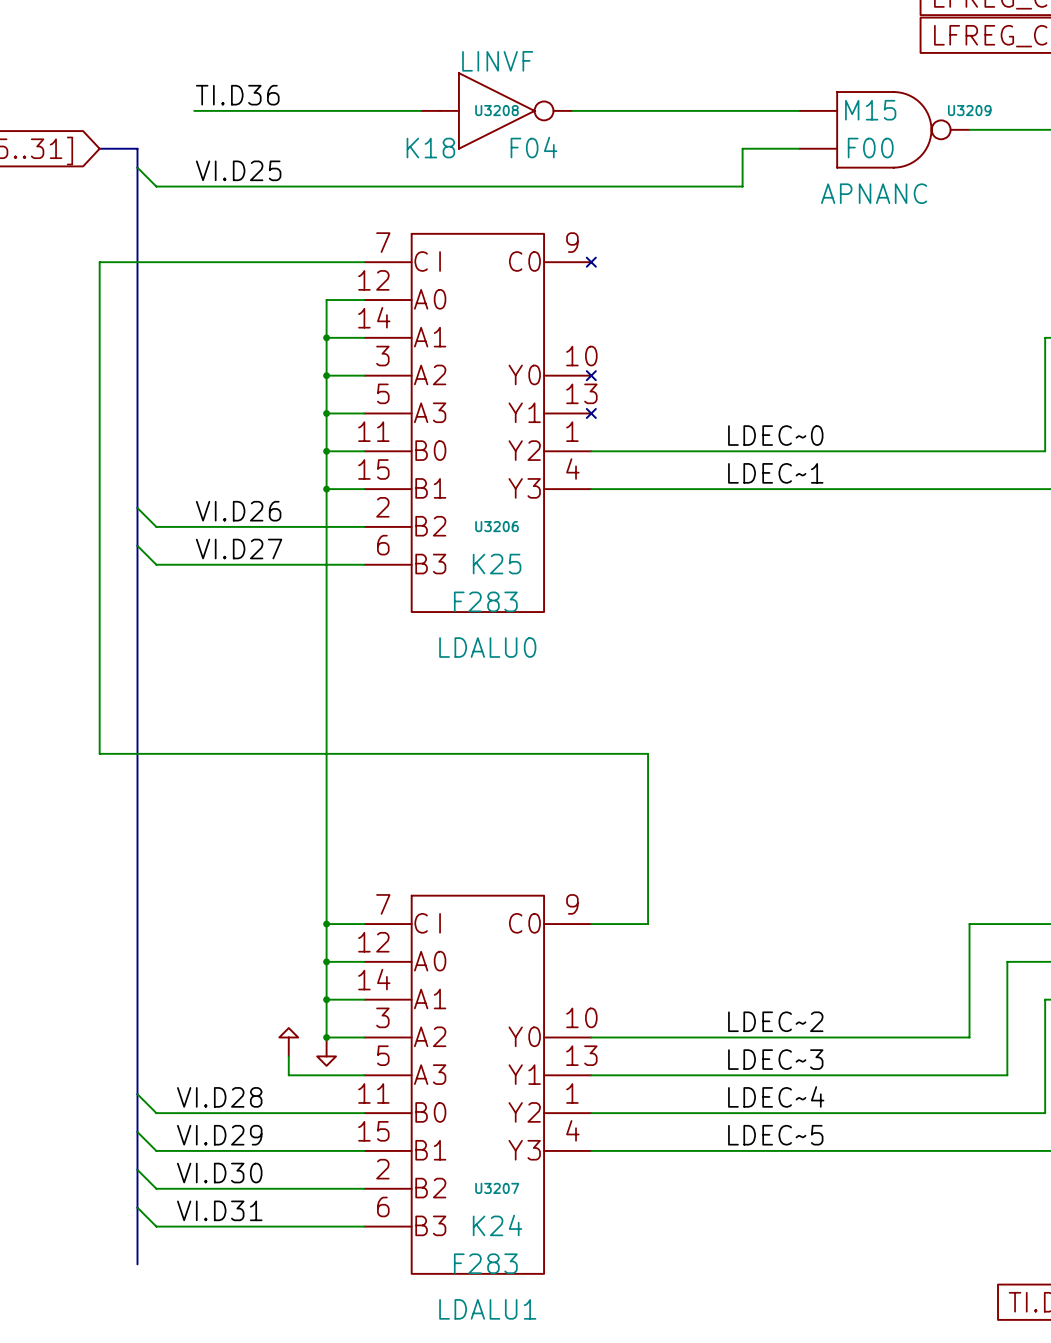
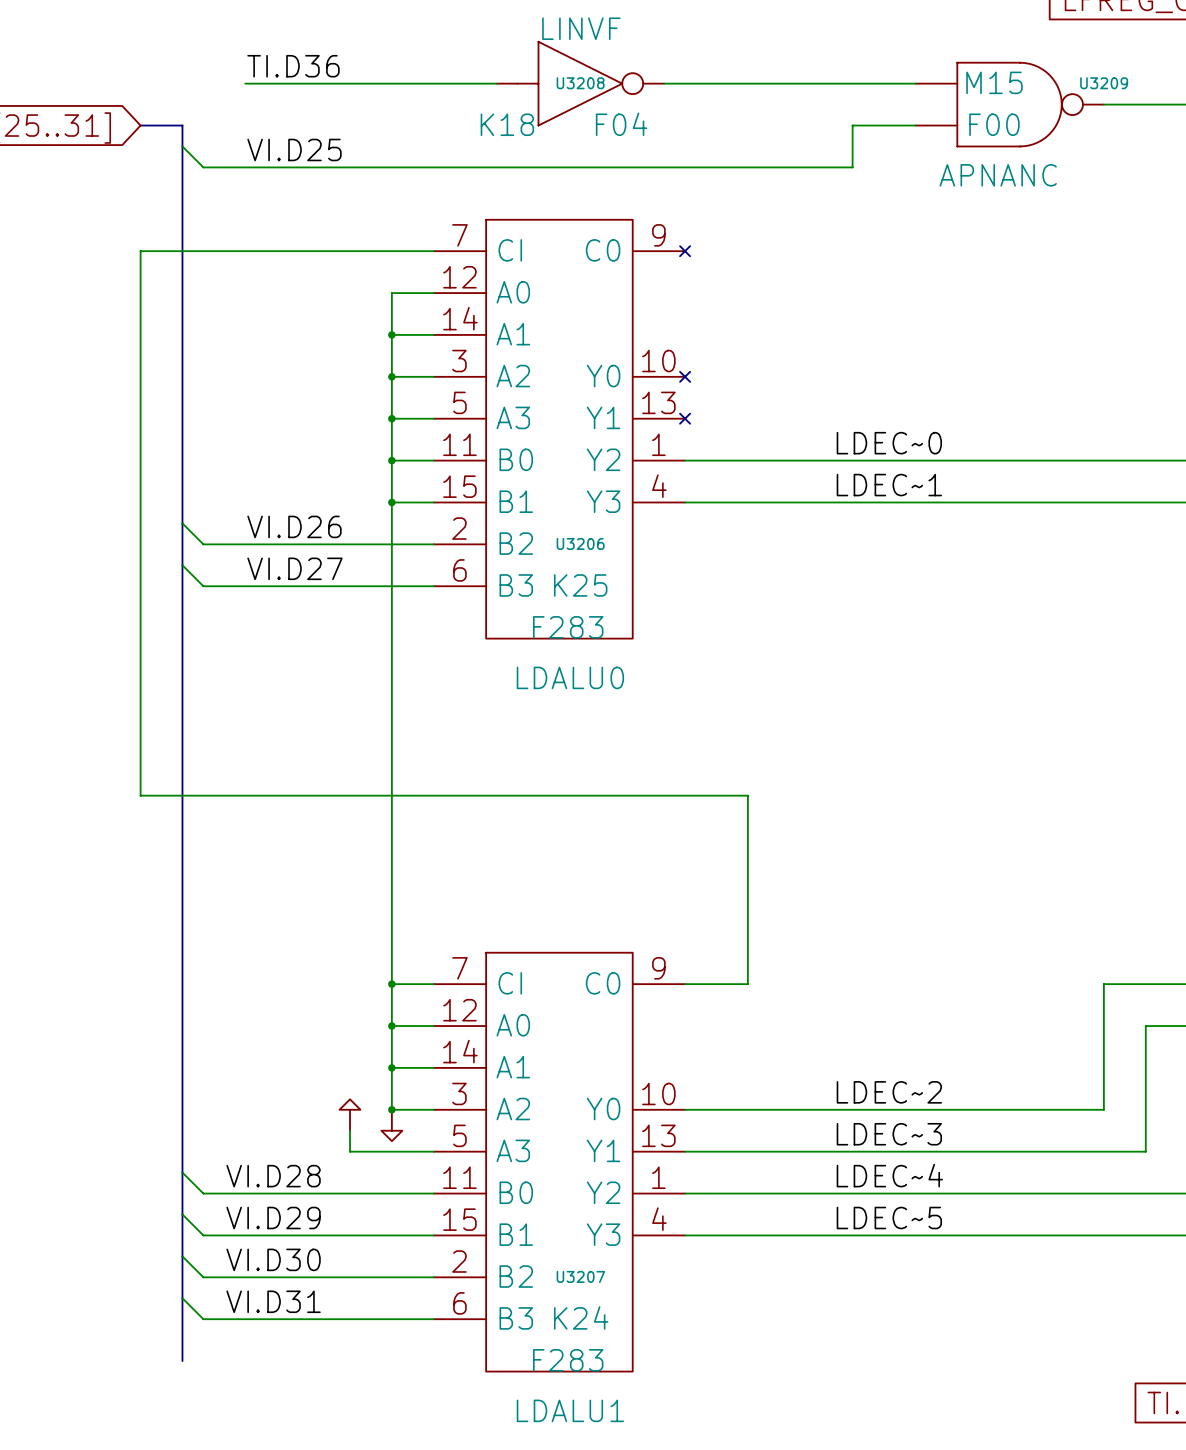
U3206 symbol: [364, 233, 592, 613] -> [433, 219, 686, 639]
U3207 symbol: [364, 895, 592, 1274] -> [433, 952, 686, 1372]

